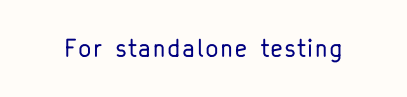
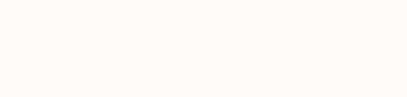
text: For standalone testing (203, 50) -> none

